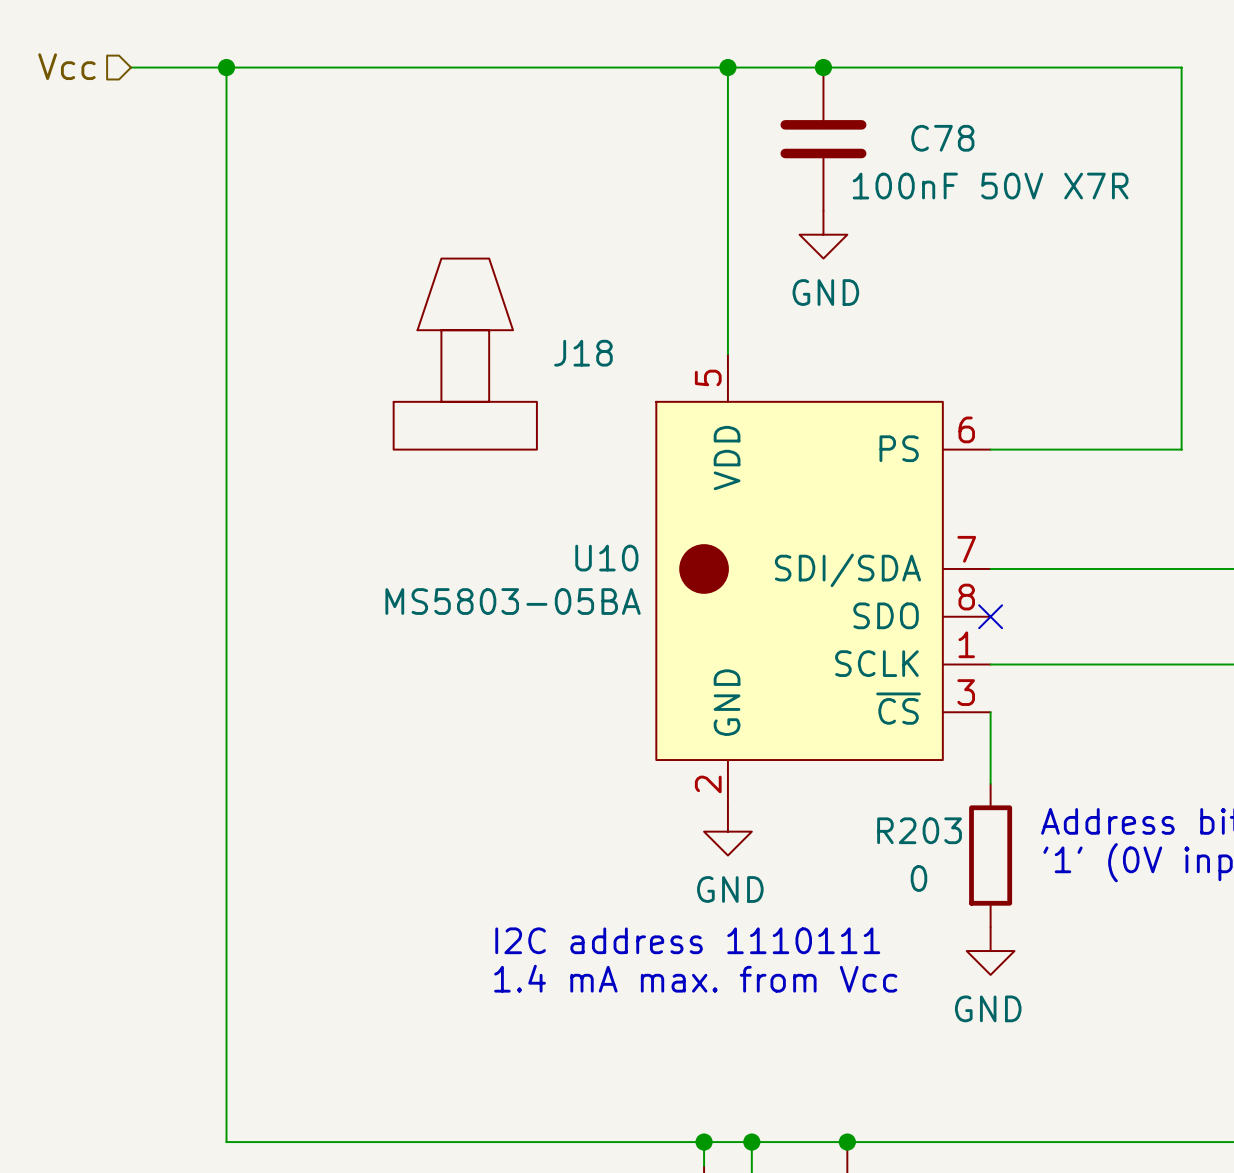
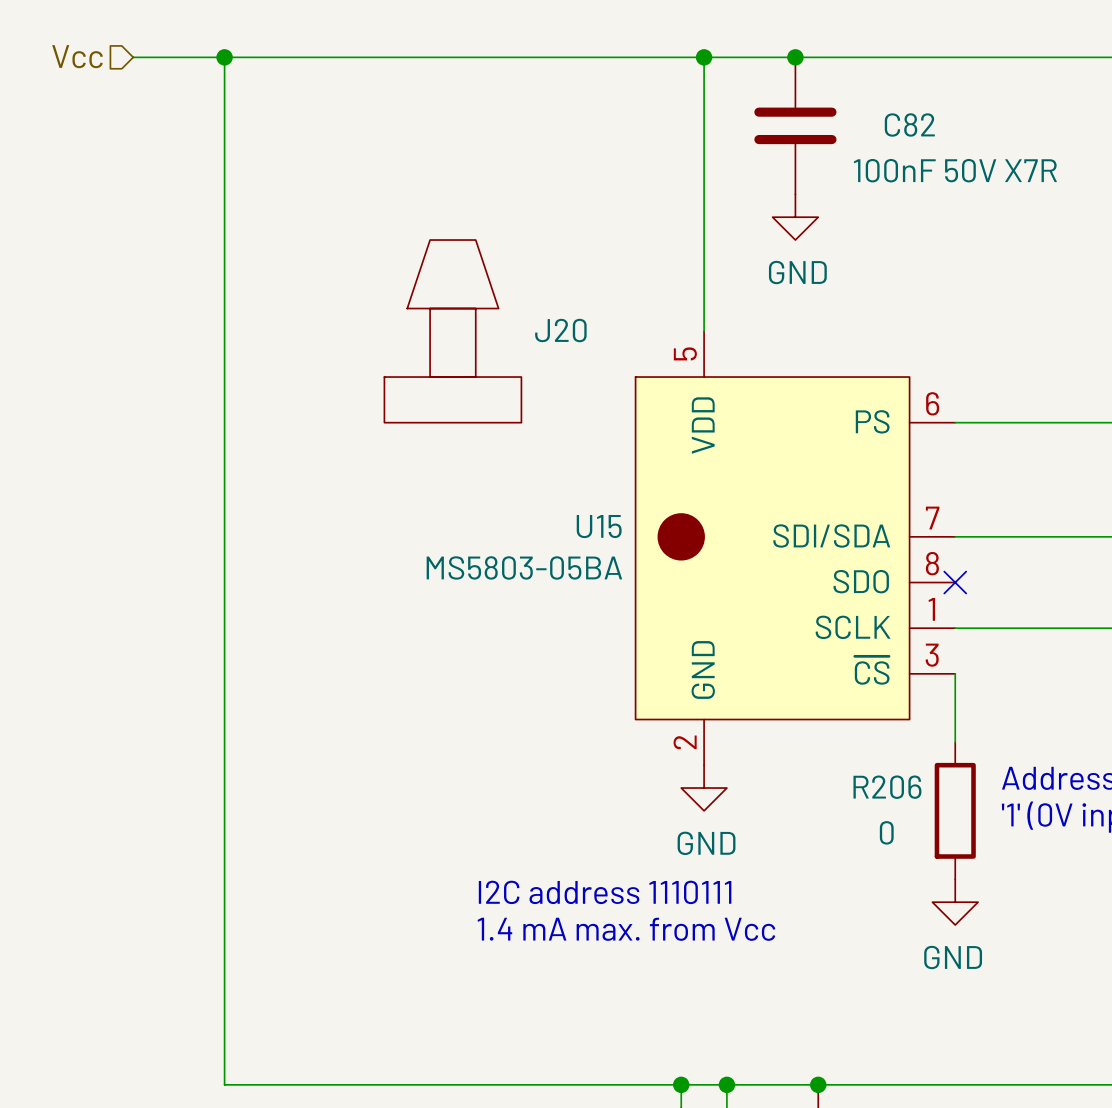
C78 name: C78 (942, 138) -> C82 (909, 124)
J18 name: J18 (583, 353) -> J20 (560, 330)
U10 name: U10 (606, 558) -> U15 (599, 526)
R203 name: R203 (919, 830) -> R206 (887, 787)

